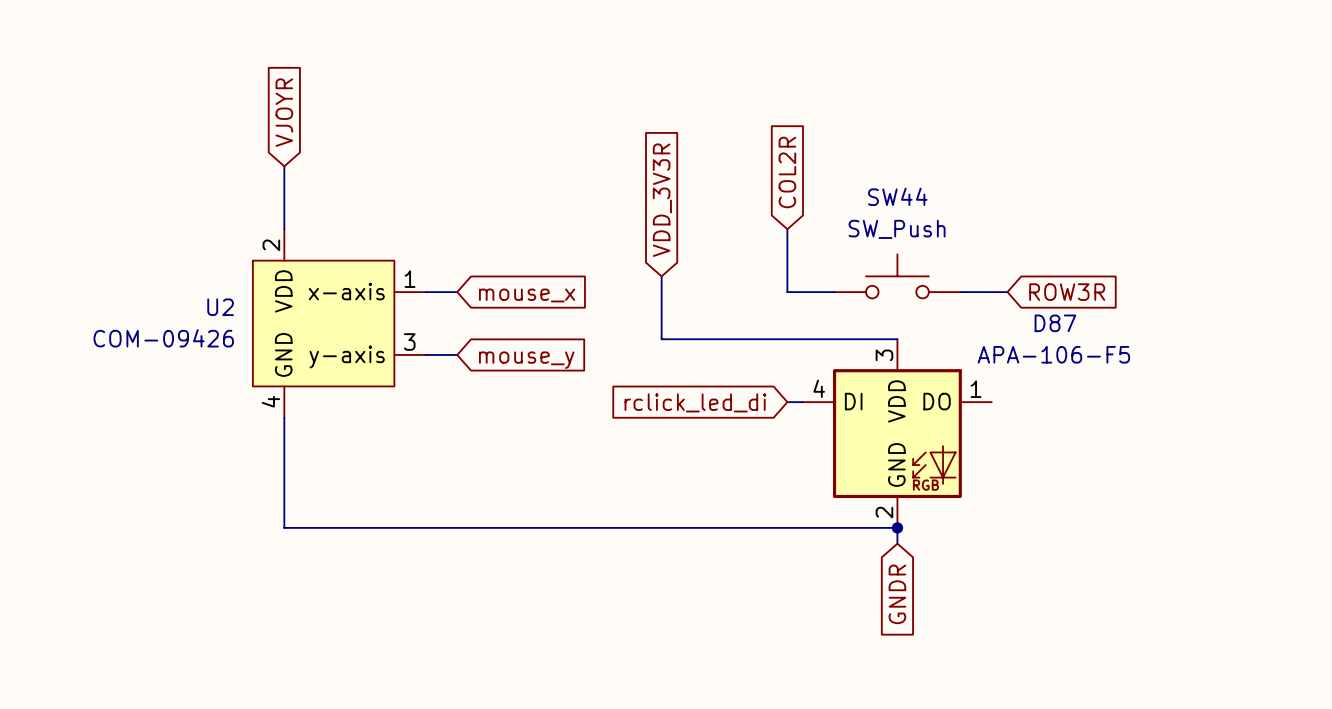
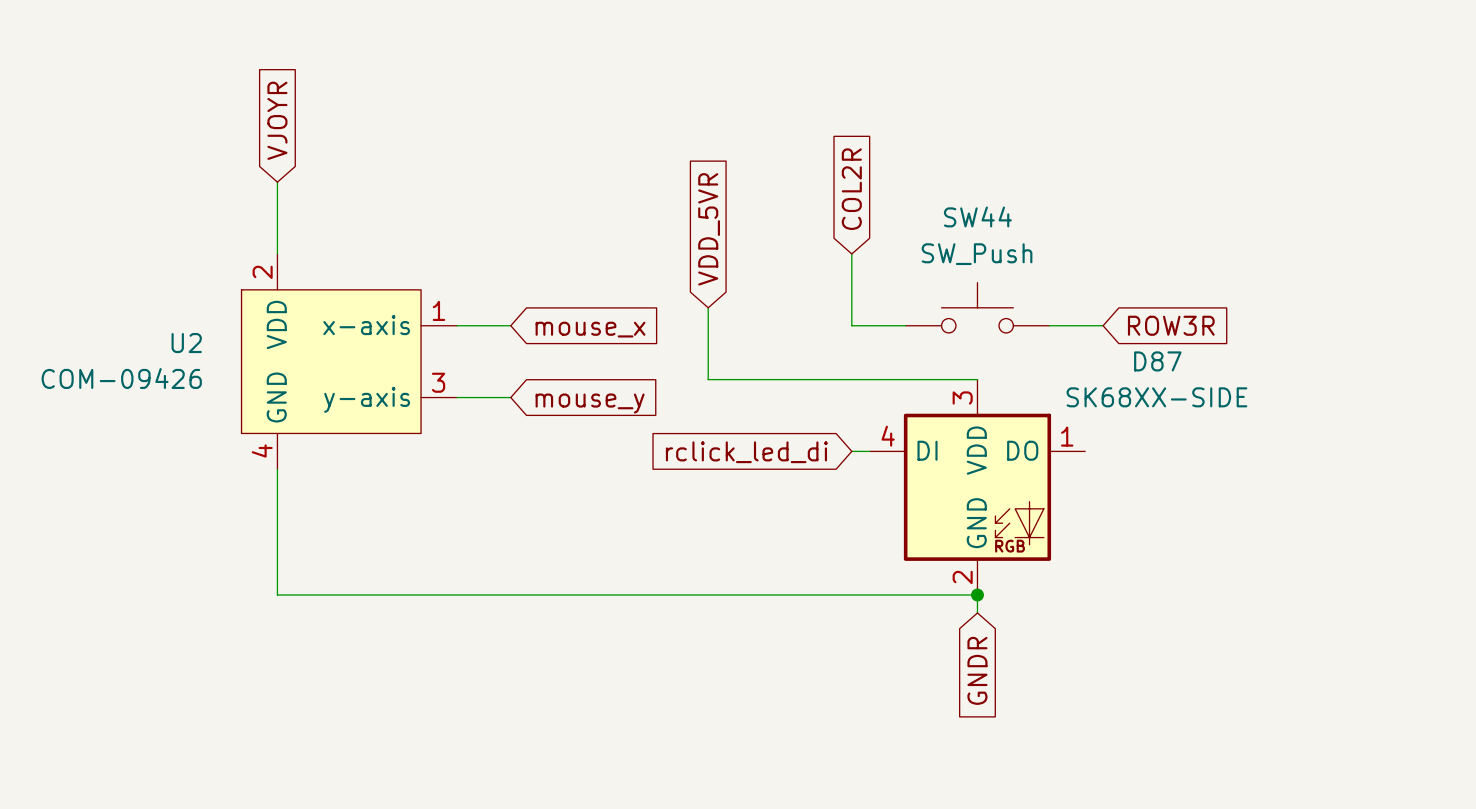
global label: VDD_3V3R (662, 200) -> VDD_5VR (709, 229)
U2 symbol: [252, 229, 426, 418] -> [241, 253, 457, 470]
wire: none -> (474, 325) (510, 325)
global label position: mouse_x (527, 295) -> mouse_x (590, 329)
wire: none -> (474, 397) (510, 397)
D87 value: APA-106-F5 (1053, 354) -> SK68XX-SIDE (1156, 397)
global label position: mouse_y (526, 360) -> mouse_y (590, 403)

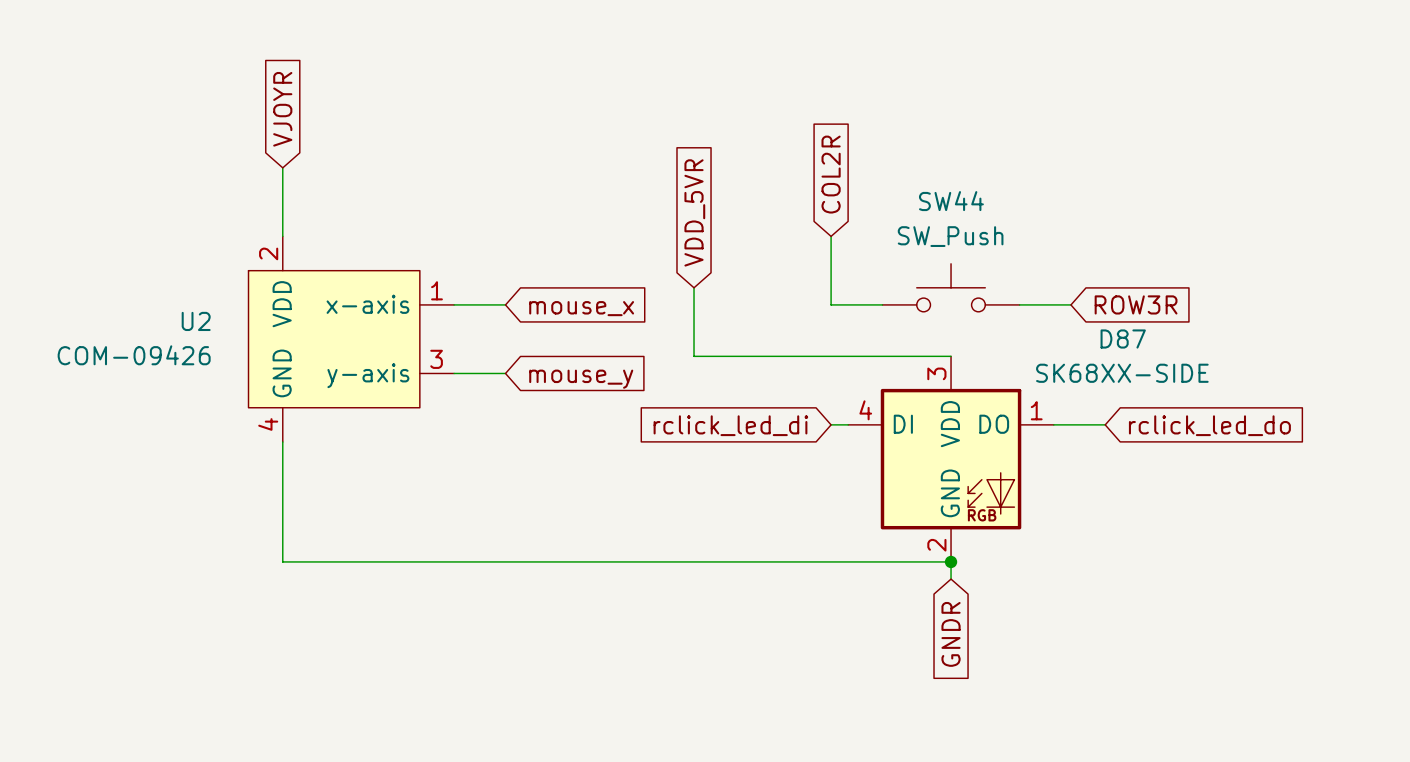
wire: none -> (1053, 424) (1105, 424)
global label: none -> rclick_led_do (1209, 425)

